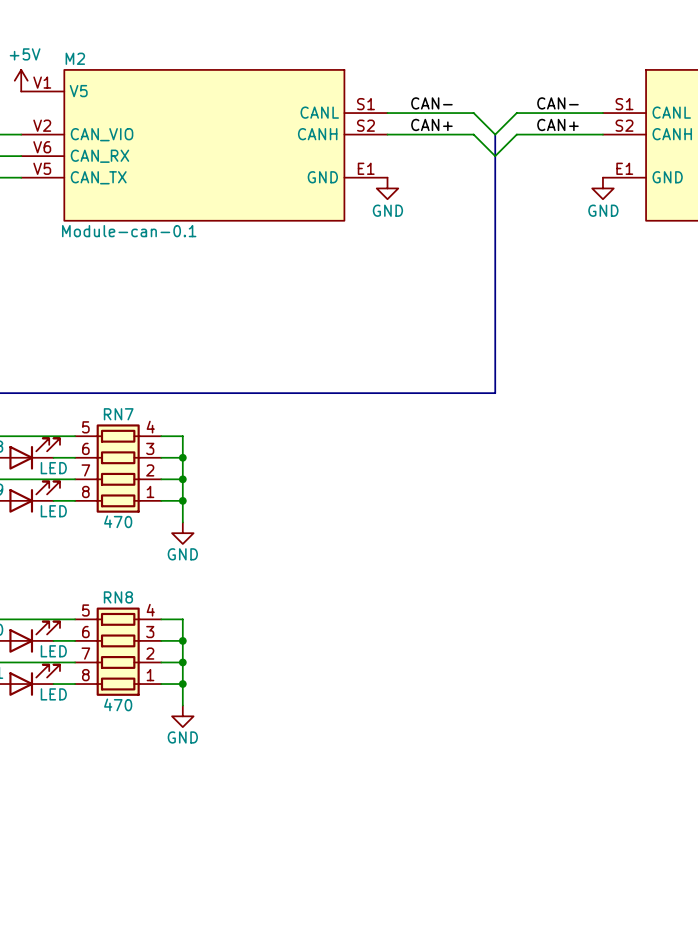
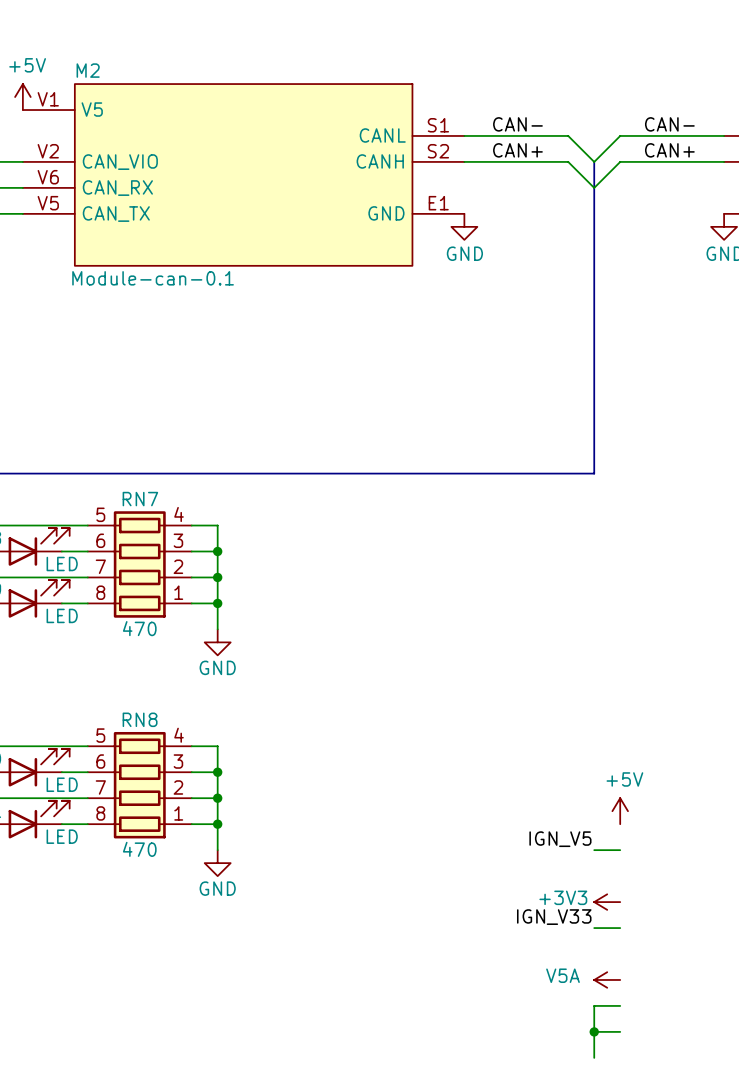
power symbol: none -> +5V (620, 811)
label: none -> IGN_V5 (560, 839)
wire: none -> (594, 850) (620, 850)
power symbol: none -> +3V3 (607, 902)
label: none -> IGN_V33 (554, 917)
wire: none -> (594, 928) (620, 928)
power symbol: none -> V5A (607, 979)
wire: none -> (620, 1005) (594, 1005) (594, 1057)
wire: none -> (594, 1031) (620, 1031)
junction: none -> (594, 1031)

